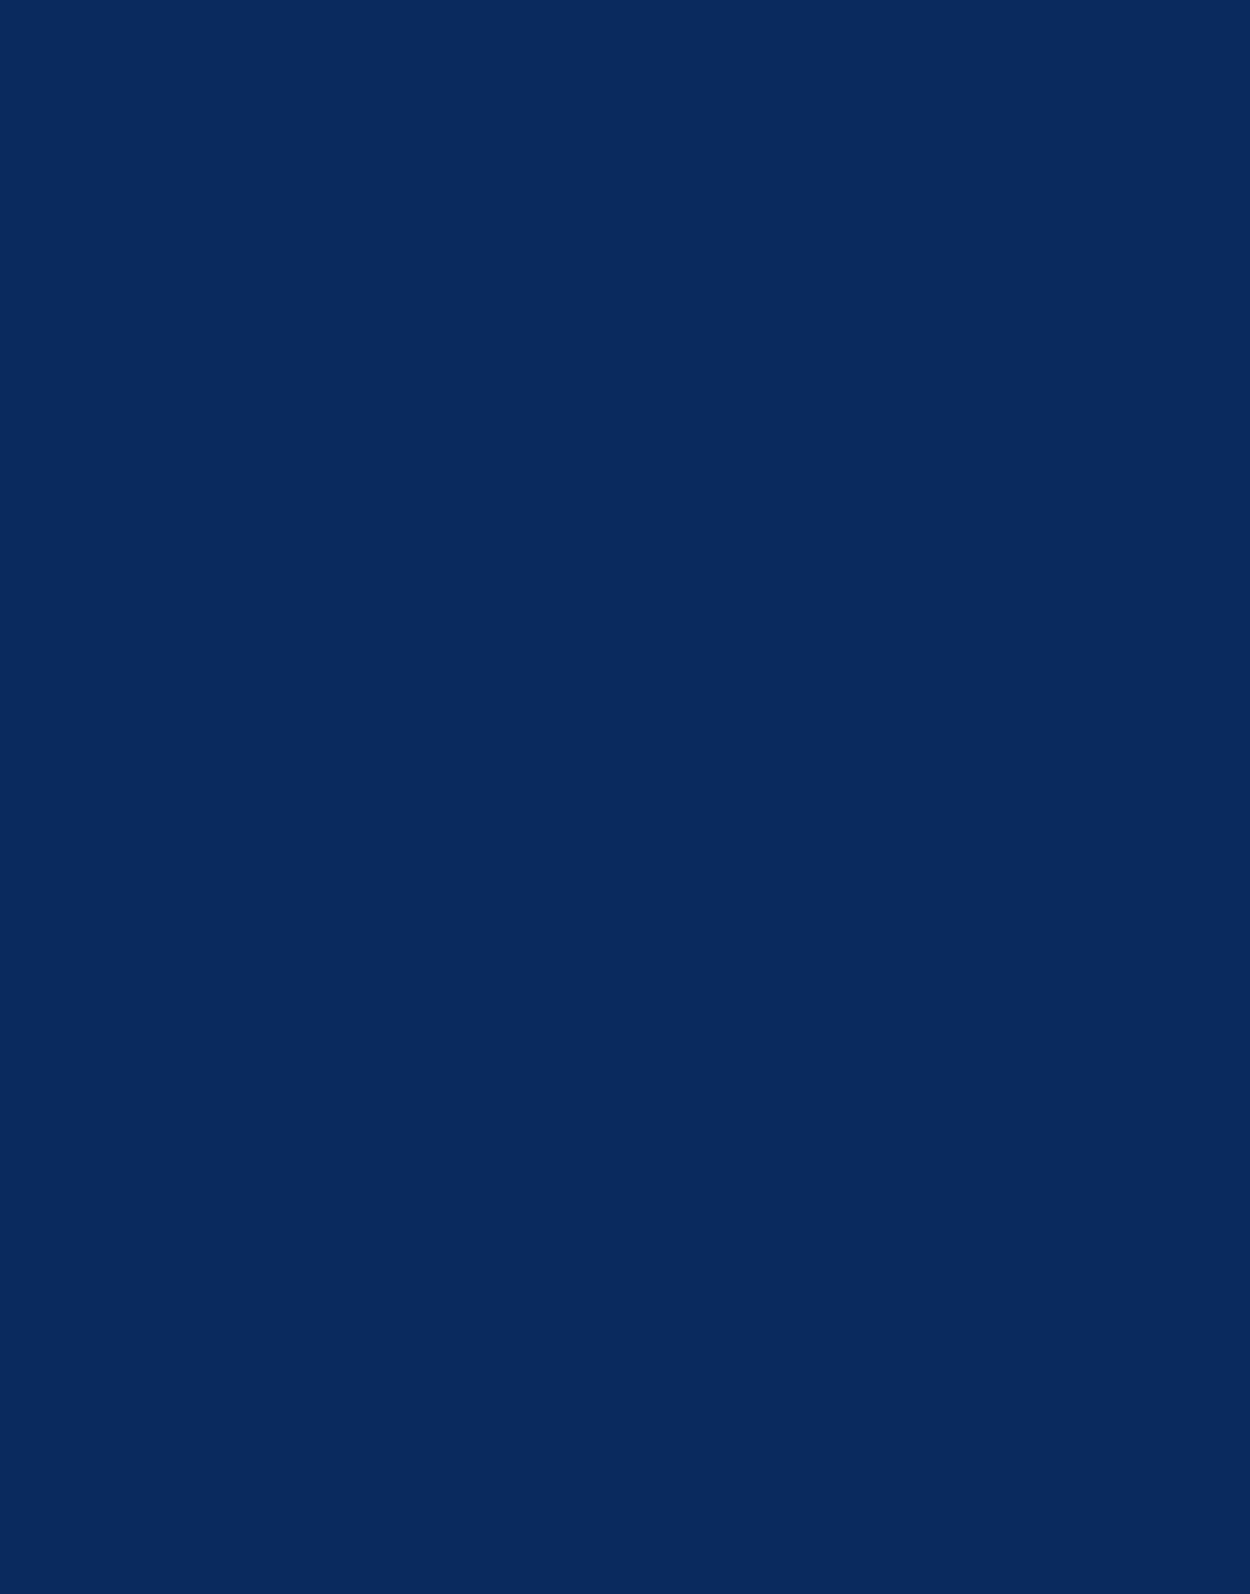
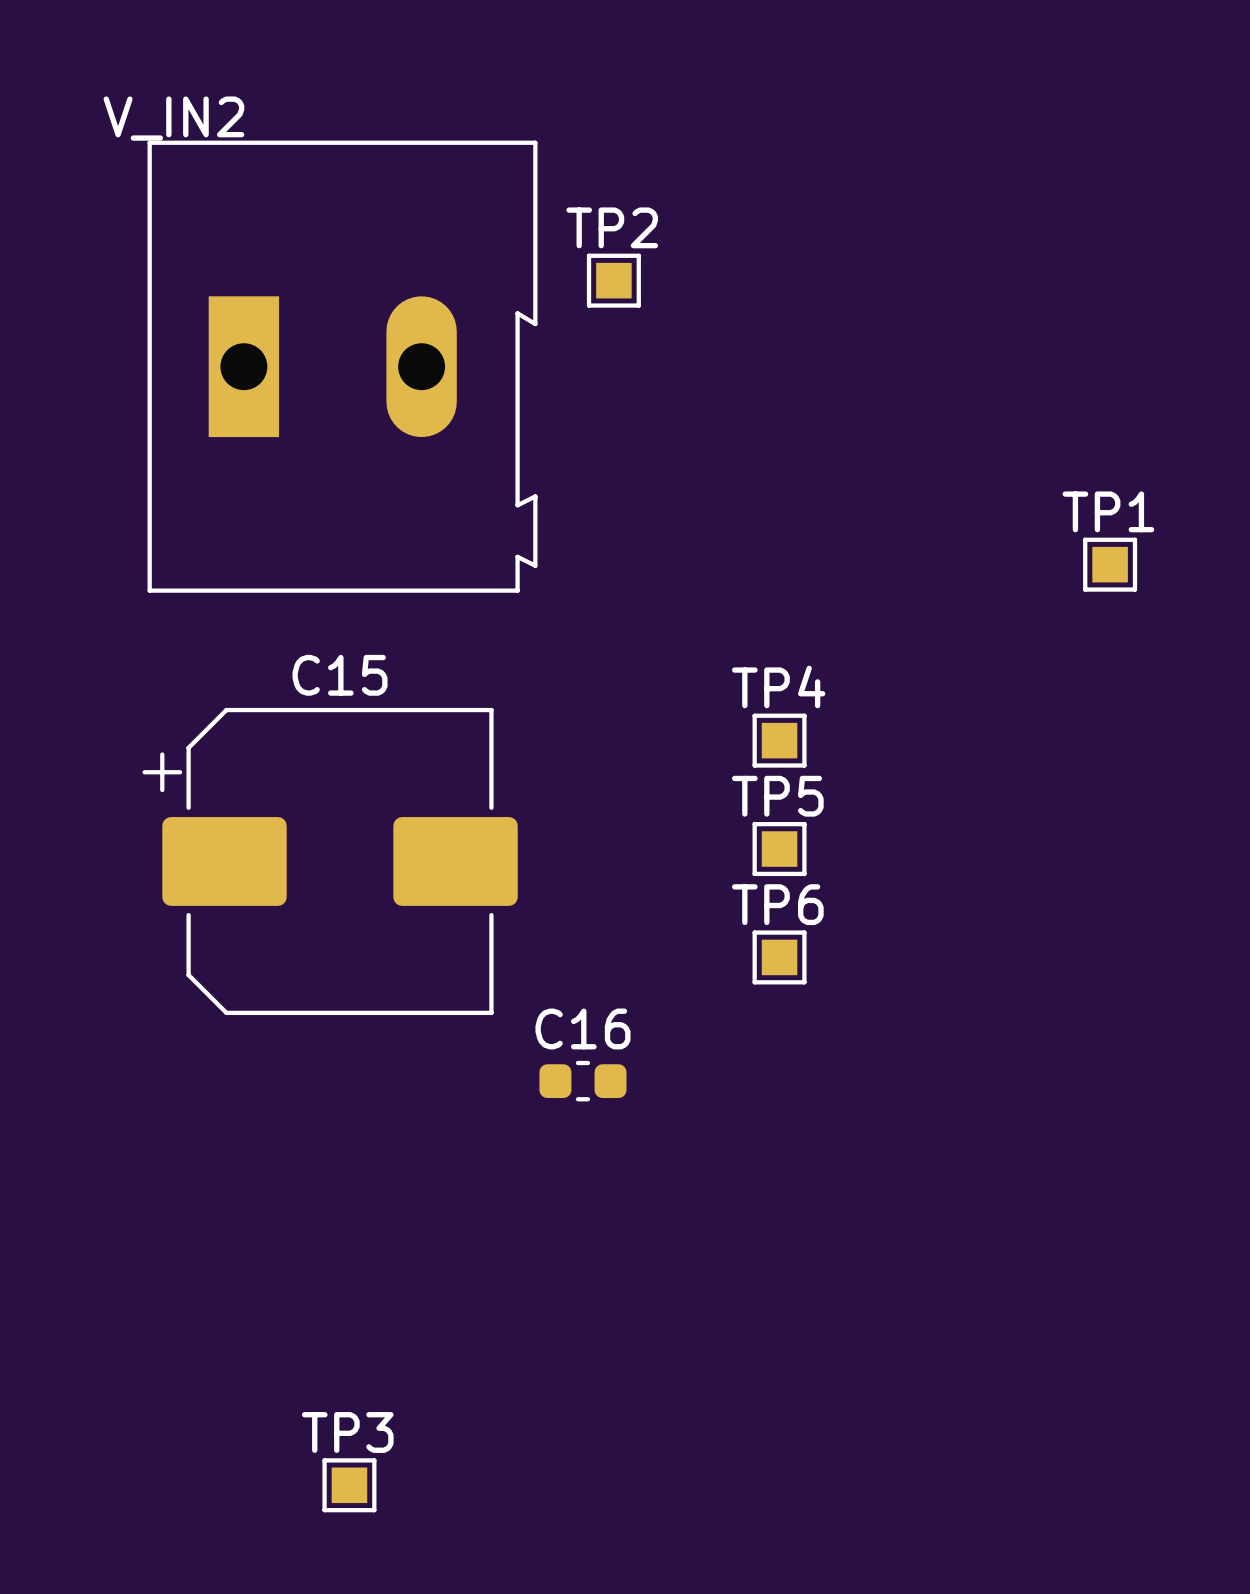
TP2: none -> (613, 280)
V_IN2: none -> (342, 366)
TP1: none -> (1110, 564)
TP4: none -> (779, 740)
TP5: none -> (779, 849)
C15: none -> (330, 861)
TP6: none -> (779, 957)
C16: none -> (582, 1081)
TP3: none -> (349, 1485)

